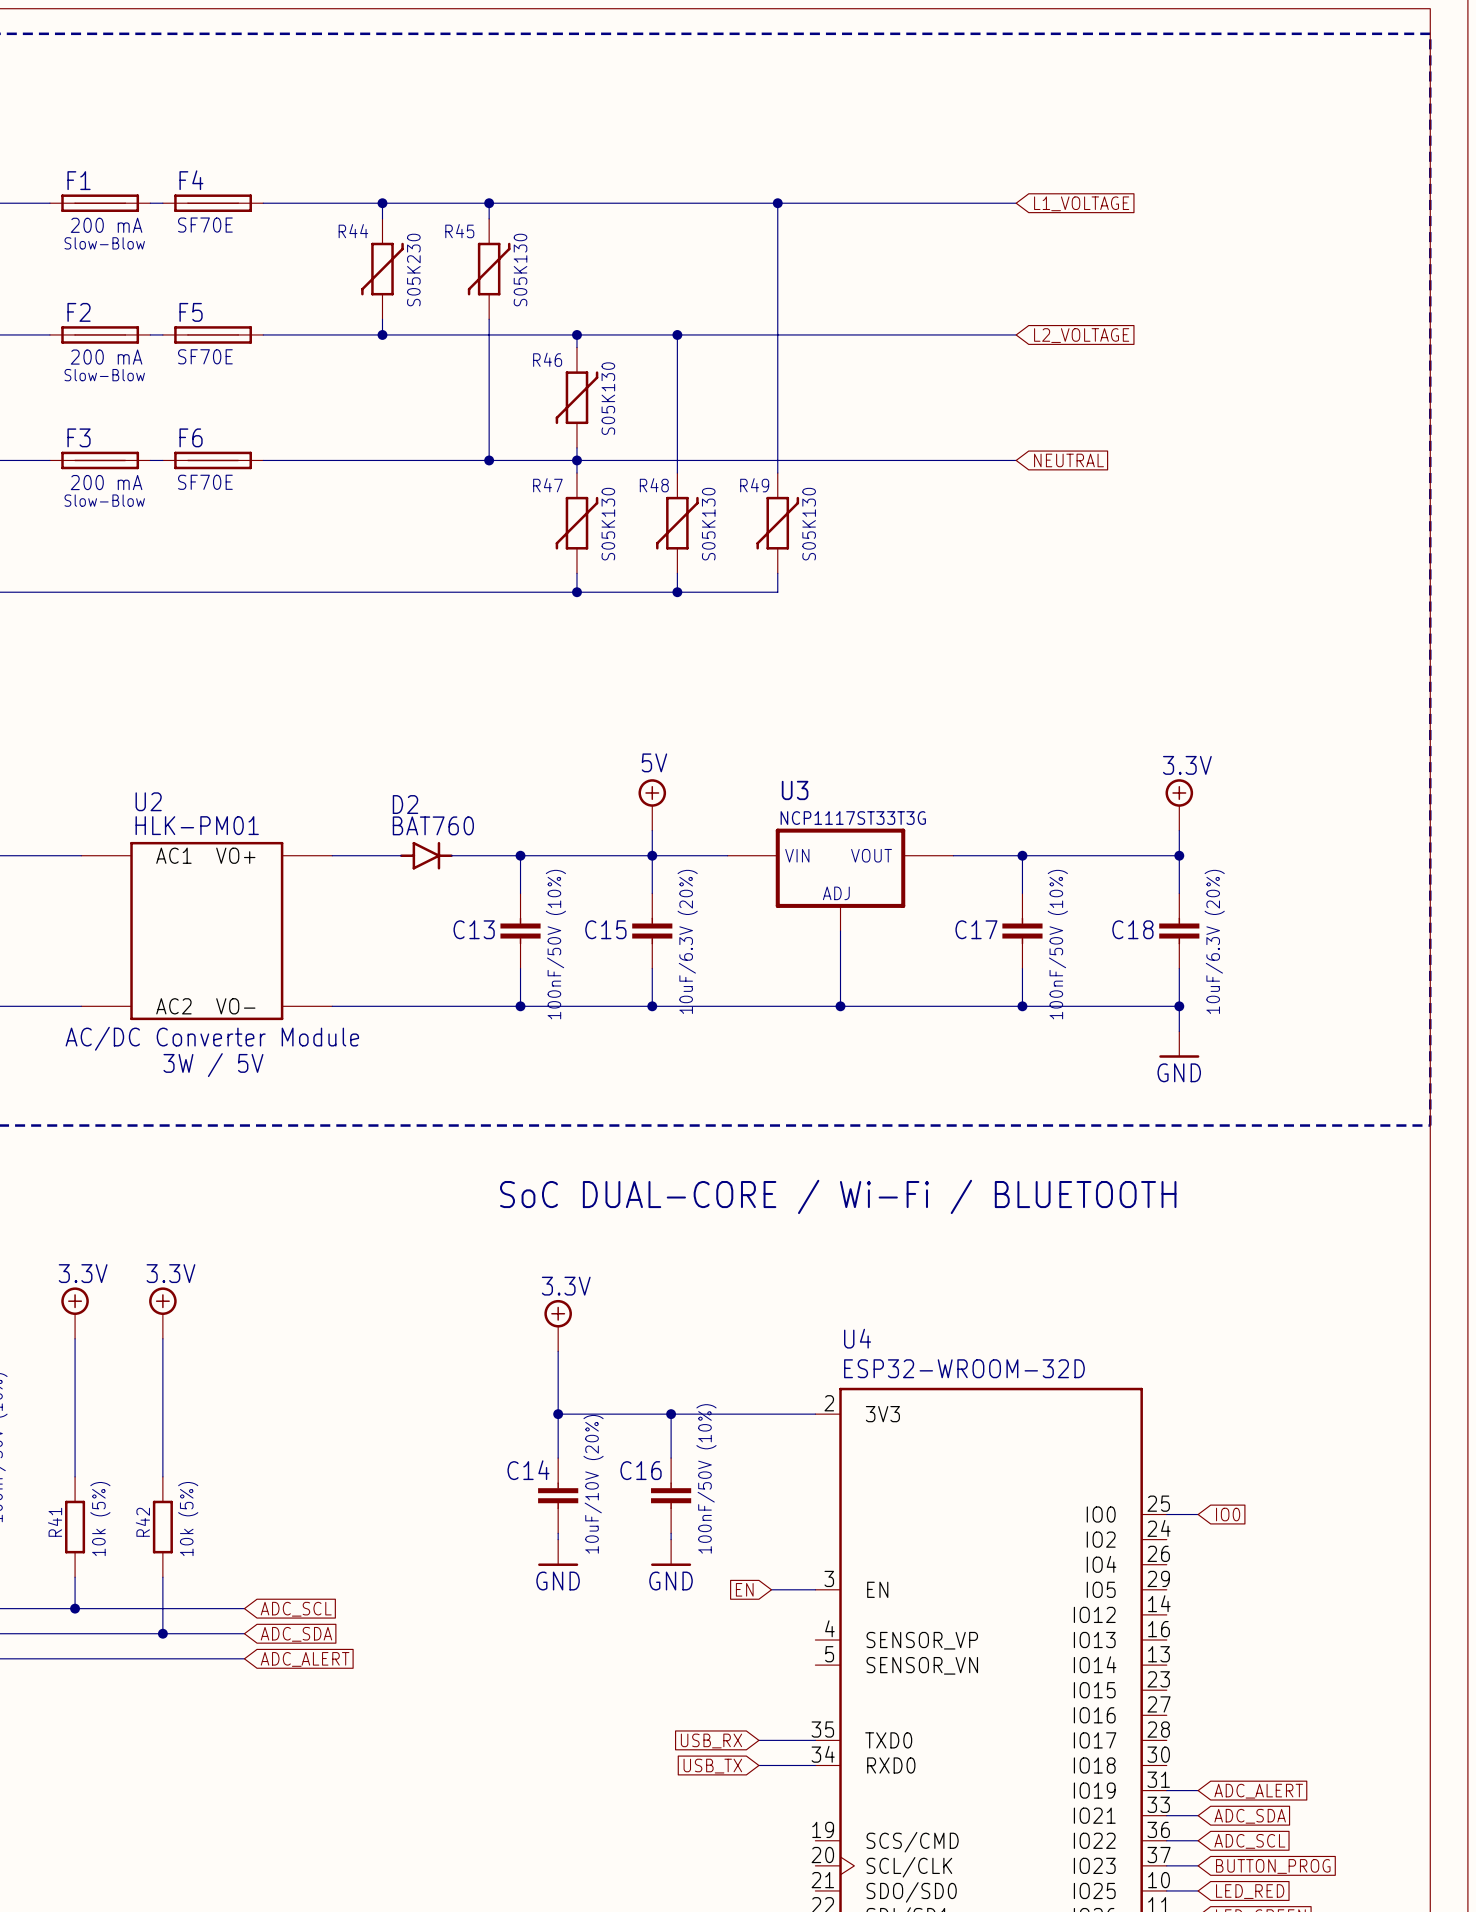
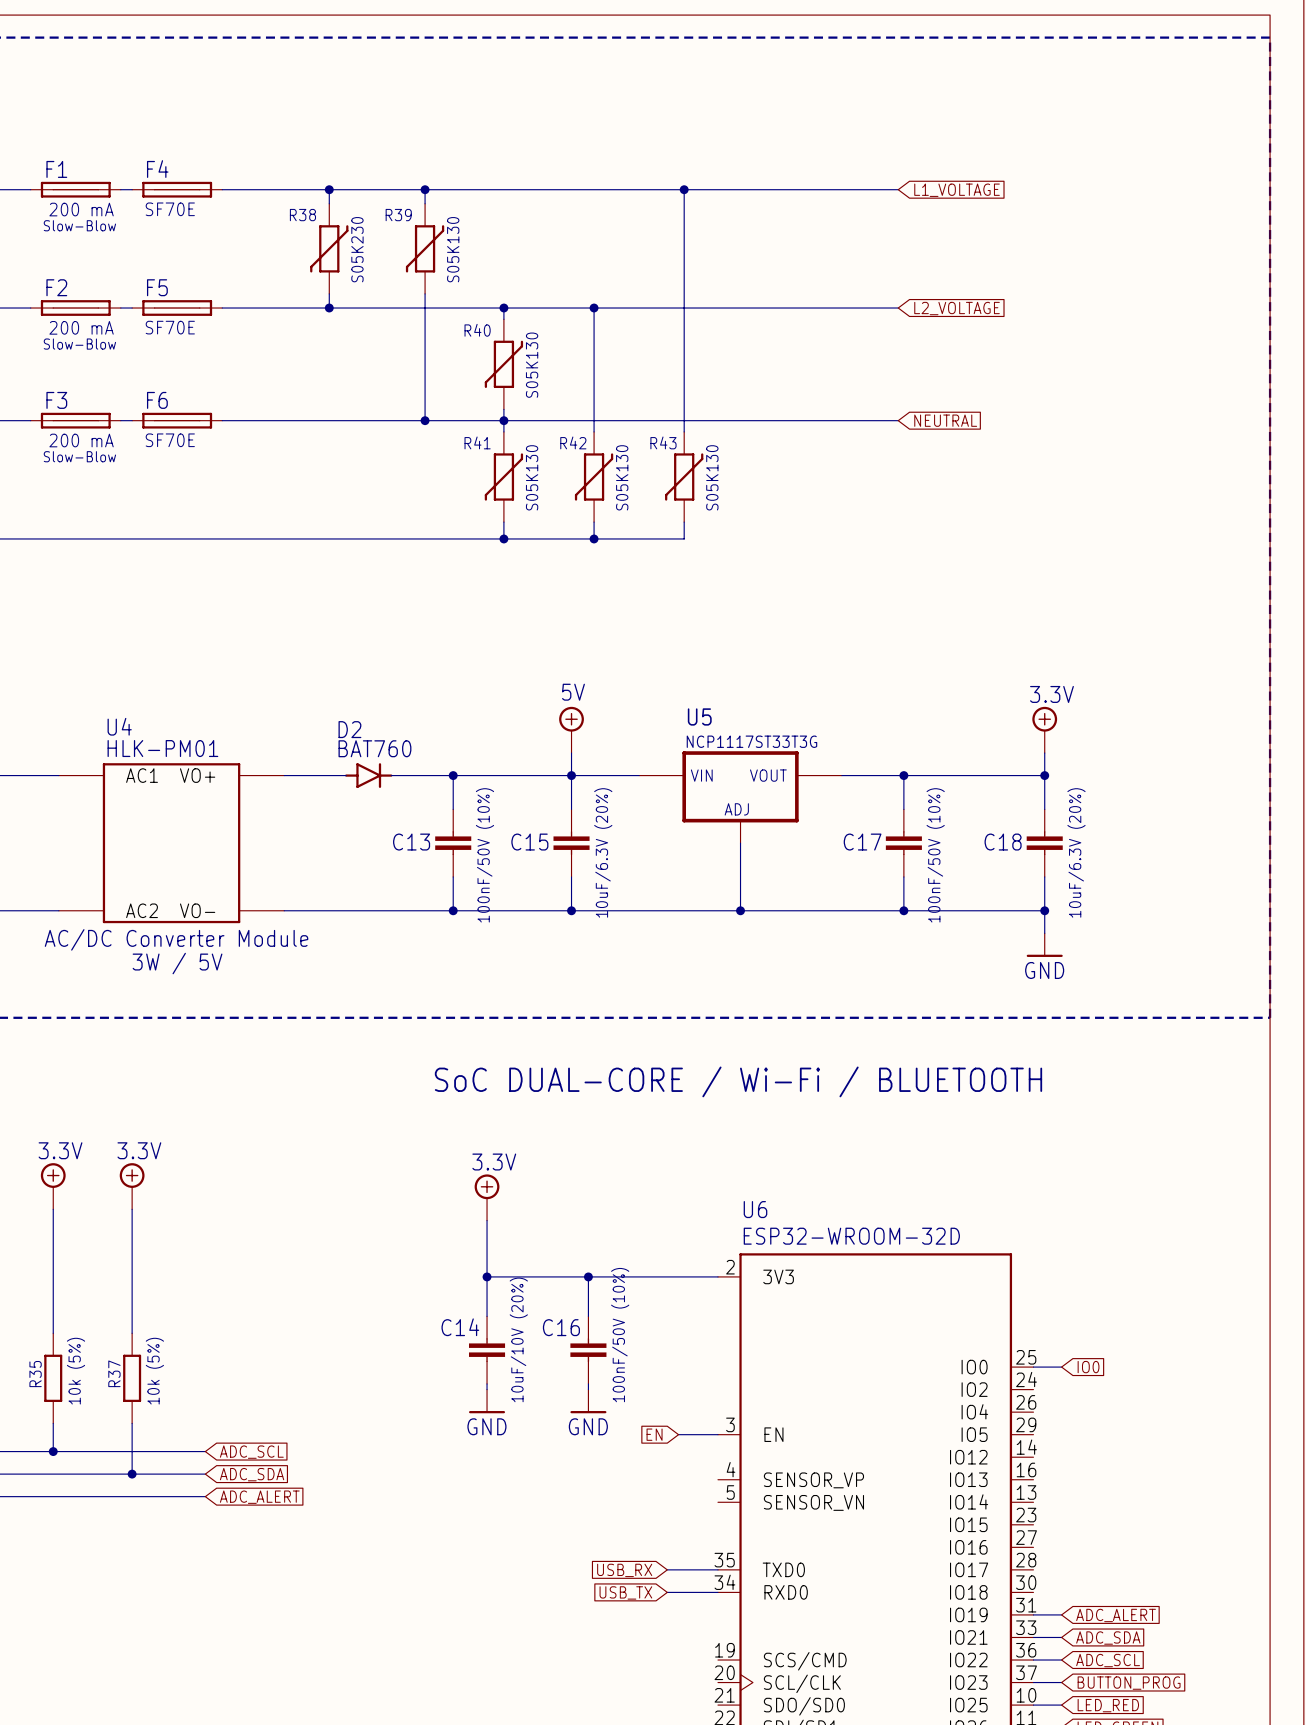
R44 name: R44 (353, 231) -> R38 (302, 215)
R45 name: R45 (459, 231) -> R39 (398, 215)
R46 name: R46 (547, 359) -> R40 (477, 330)
R47 name: R47 (547, 485) -> R41 (477, 442)
R48 name: R48 (654, 485) -> R42 (573, 442)
R49 name: R49 (754, 485) -> R43 (663, 442)
U3 name: U3 (795, 790) -> U5 (699, 716)
U2 name: U2 (148, 801) -> U4 (119, 726)
U4 name: U4 (857, 1338) -> U6 (755, 1209)
R41 name: R41 (55, 1522) -> R35 (35, 1374)
R42 name: R42 (142, 1522) -> R37 (114, 1373)

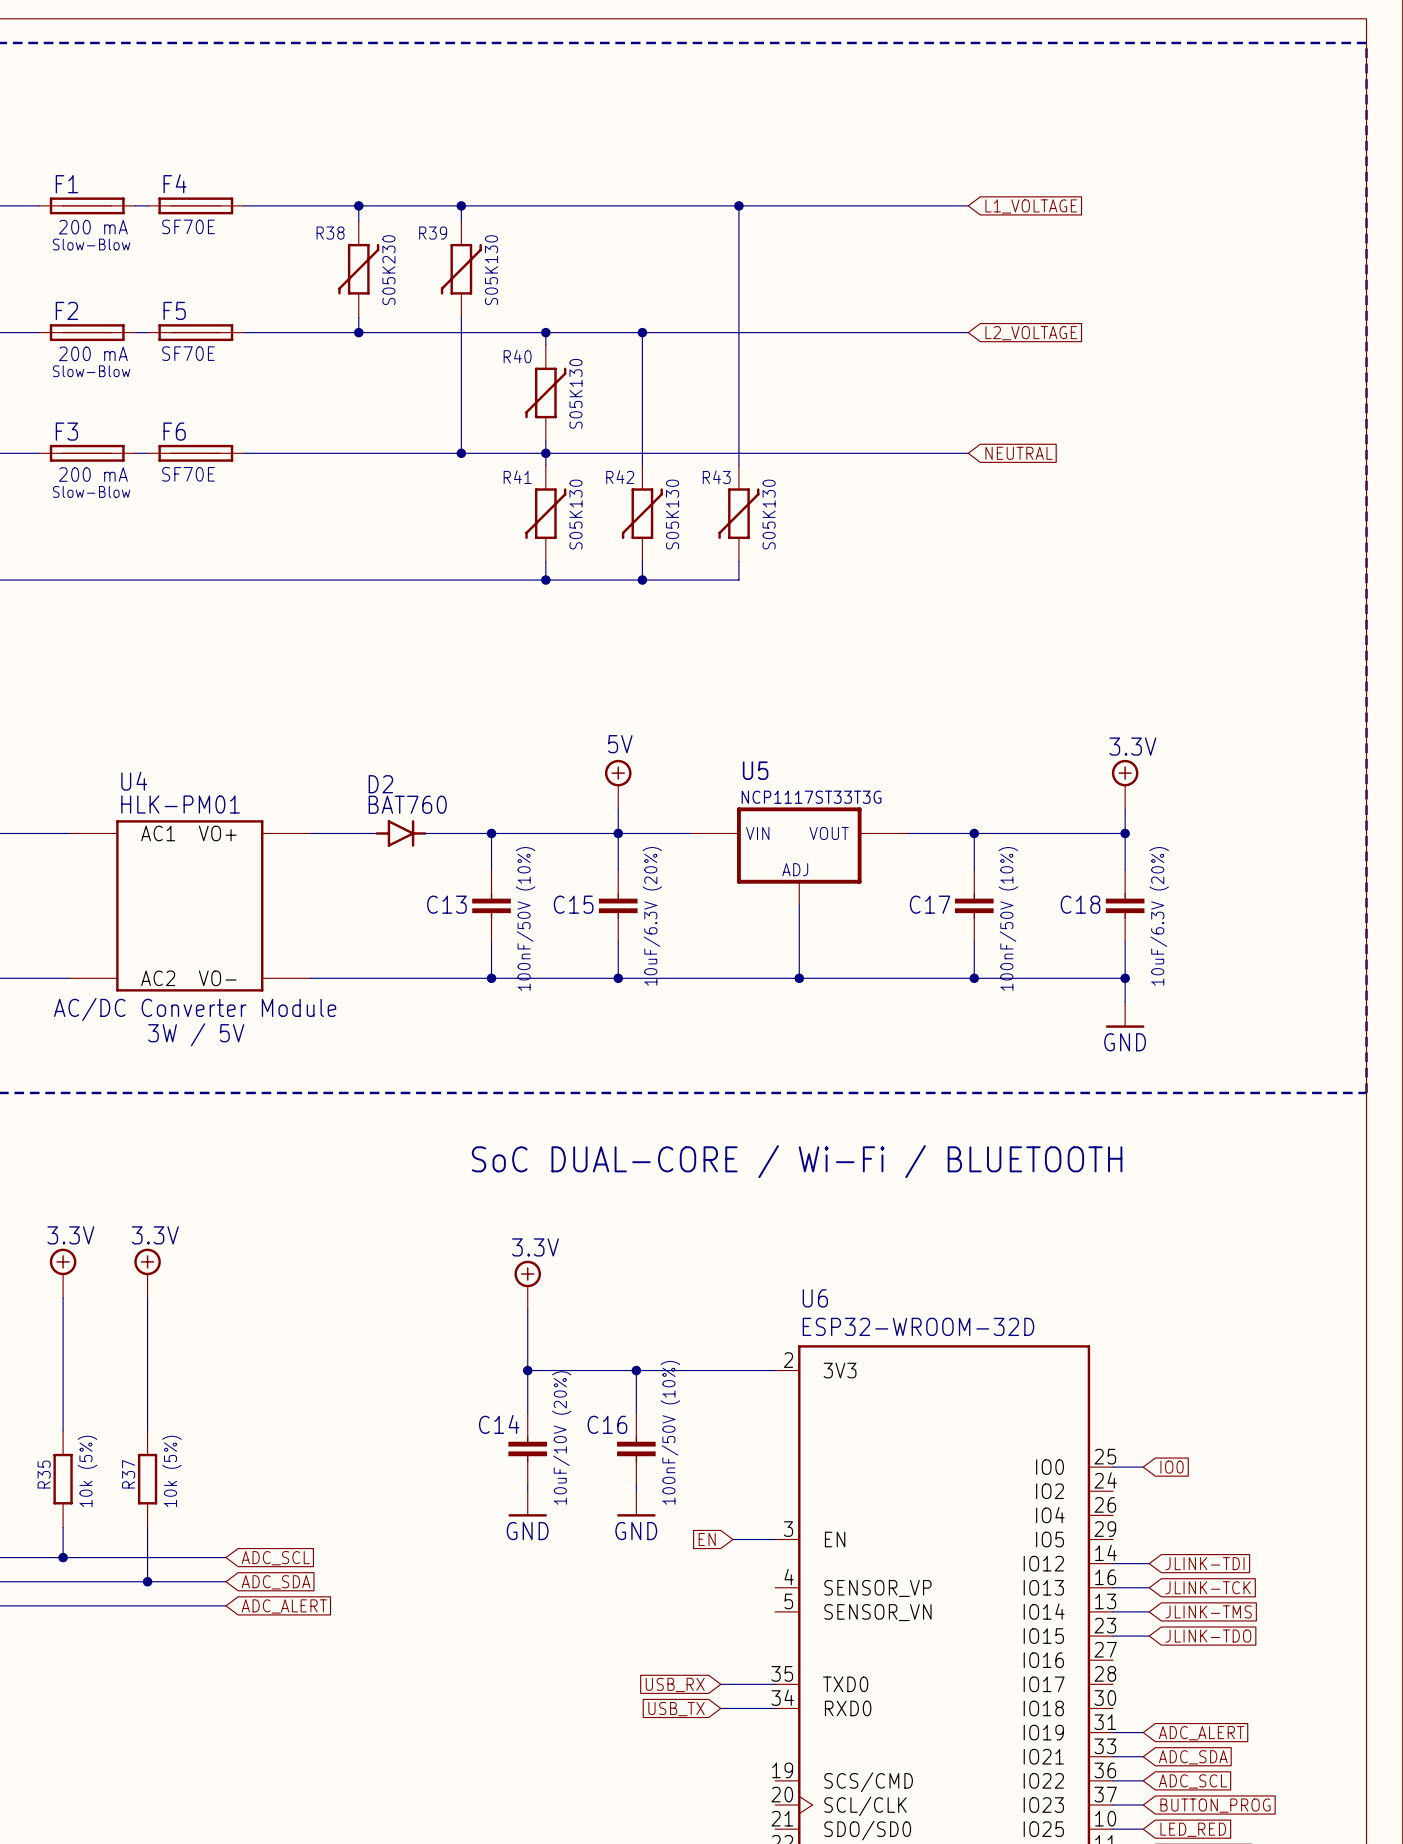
wire: none -> (1113, 1563) (1149, 1563)
global label: none -> JLINK-TDI (1205, 1563)
wire: none -> (1113, 1587) (1149, 1587)
global label: none -> JLINK-TCK (1208, 1587)
wire: none -> (1113, 1611) (1149, 1611)
global label: none -> JLINK-TMS (1208, 1611)
wire: none -> (1113, 1636) (1149, 1636)
global label: none -> JLINK-TDO (1208, 1636)

